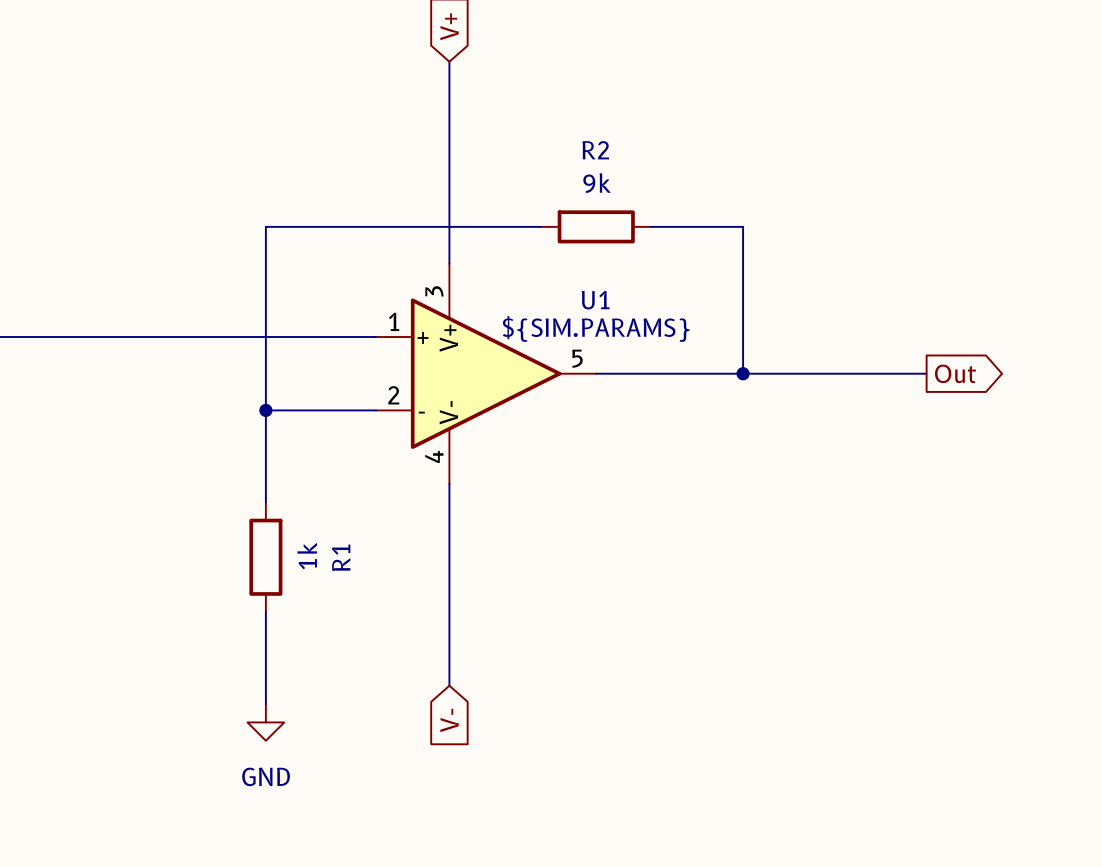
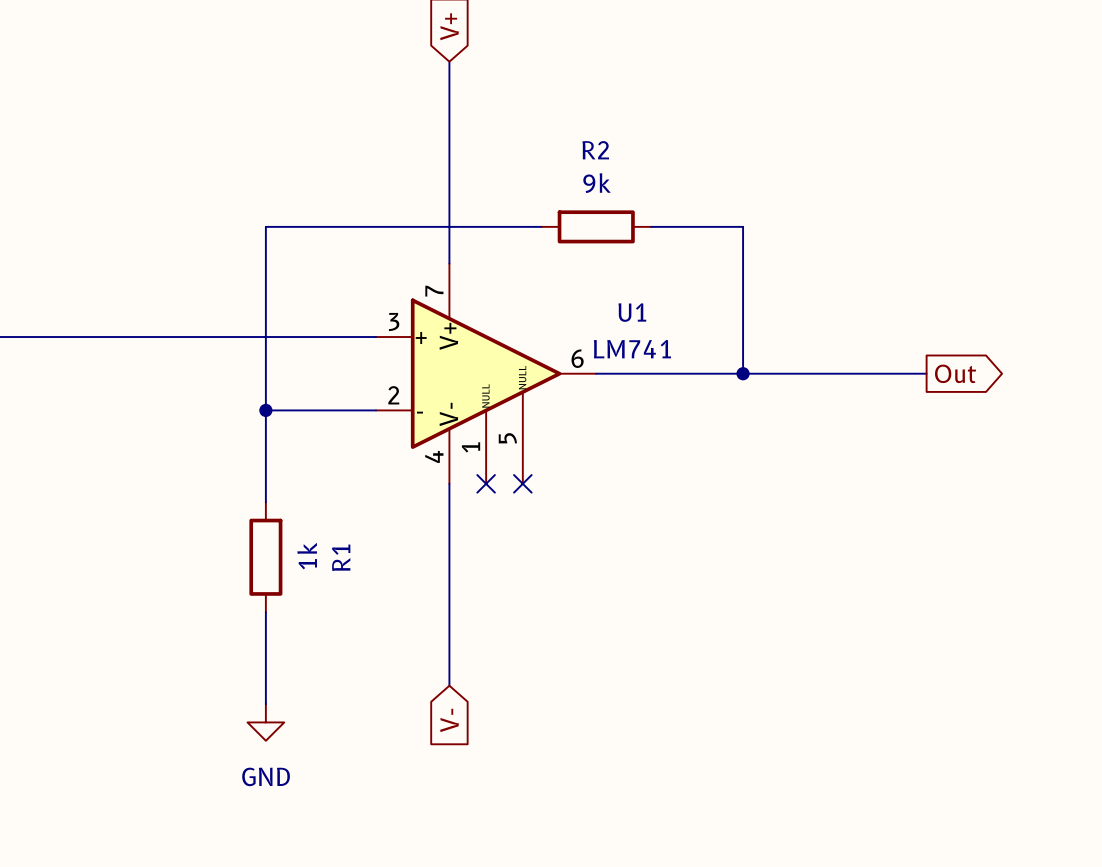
U1 symbol: [376, 263, 597, 484] -> [376, 263, 597, 484]
U1 name position: U1 (595, 300) -> U1 (632, 312)
U1 value: ${SIM.PARAMS} (596, 328) -> LM741 (632, 349)
no-connect mark: none -> (486, 483)
no-connect mark: none -> (522, 483)

